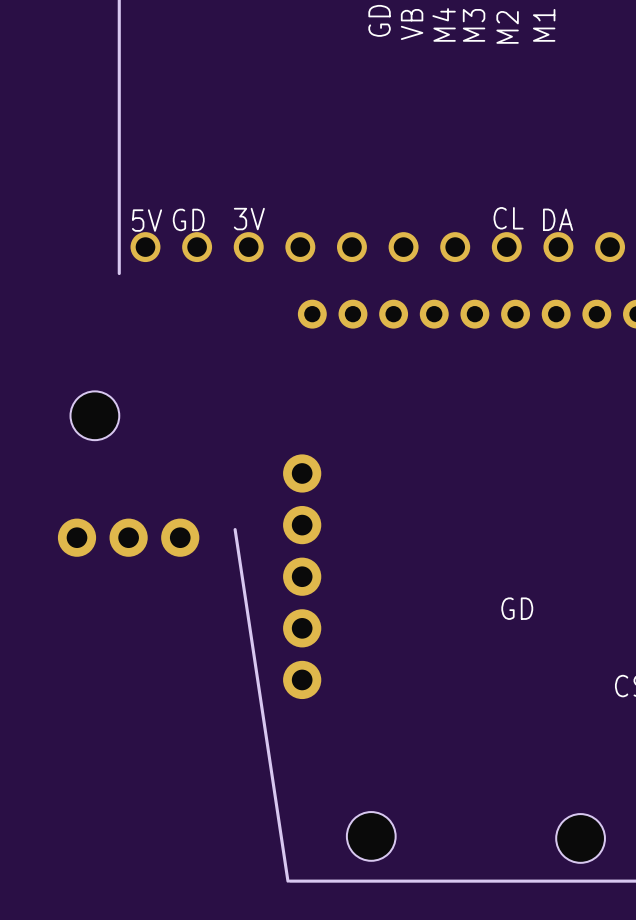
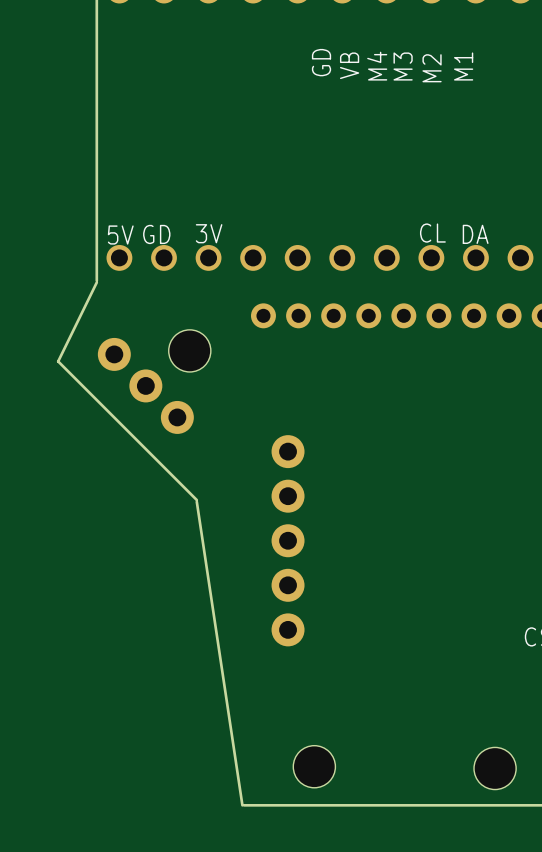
board edge: none -> (96, 282) (58, 361) (196, 500)
part: none -> (145, 385)
hole position: (94, 415) -> (189, 350)
part: (128, 537) -> none
part position: (302, 576) -> (288, 540)
text: GD (517, 608) -> none

